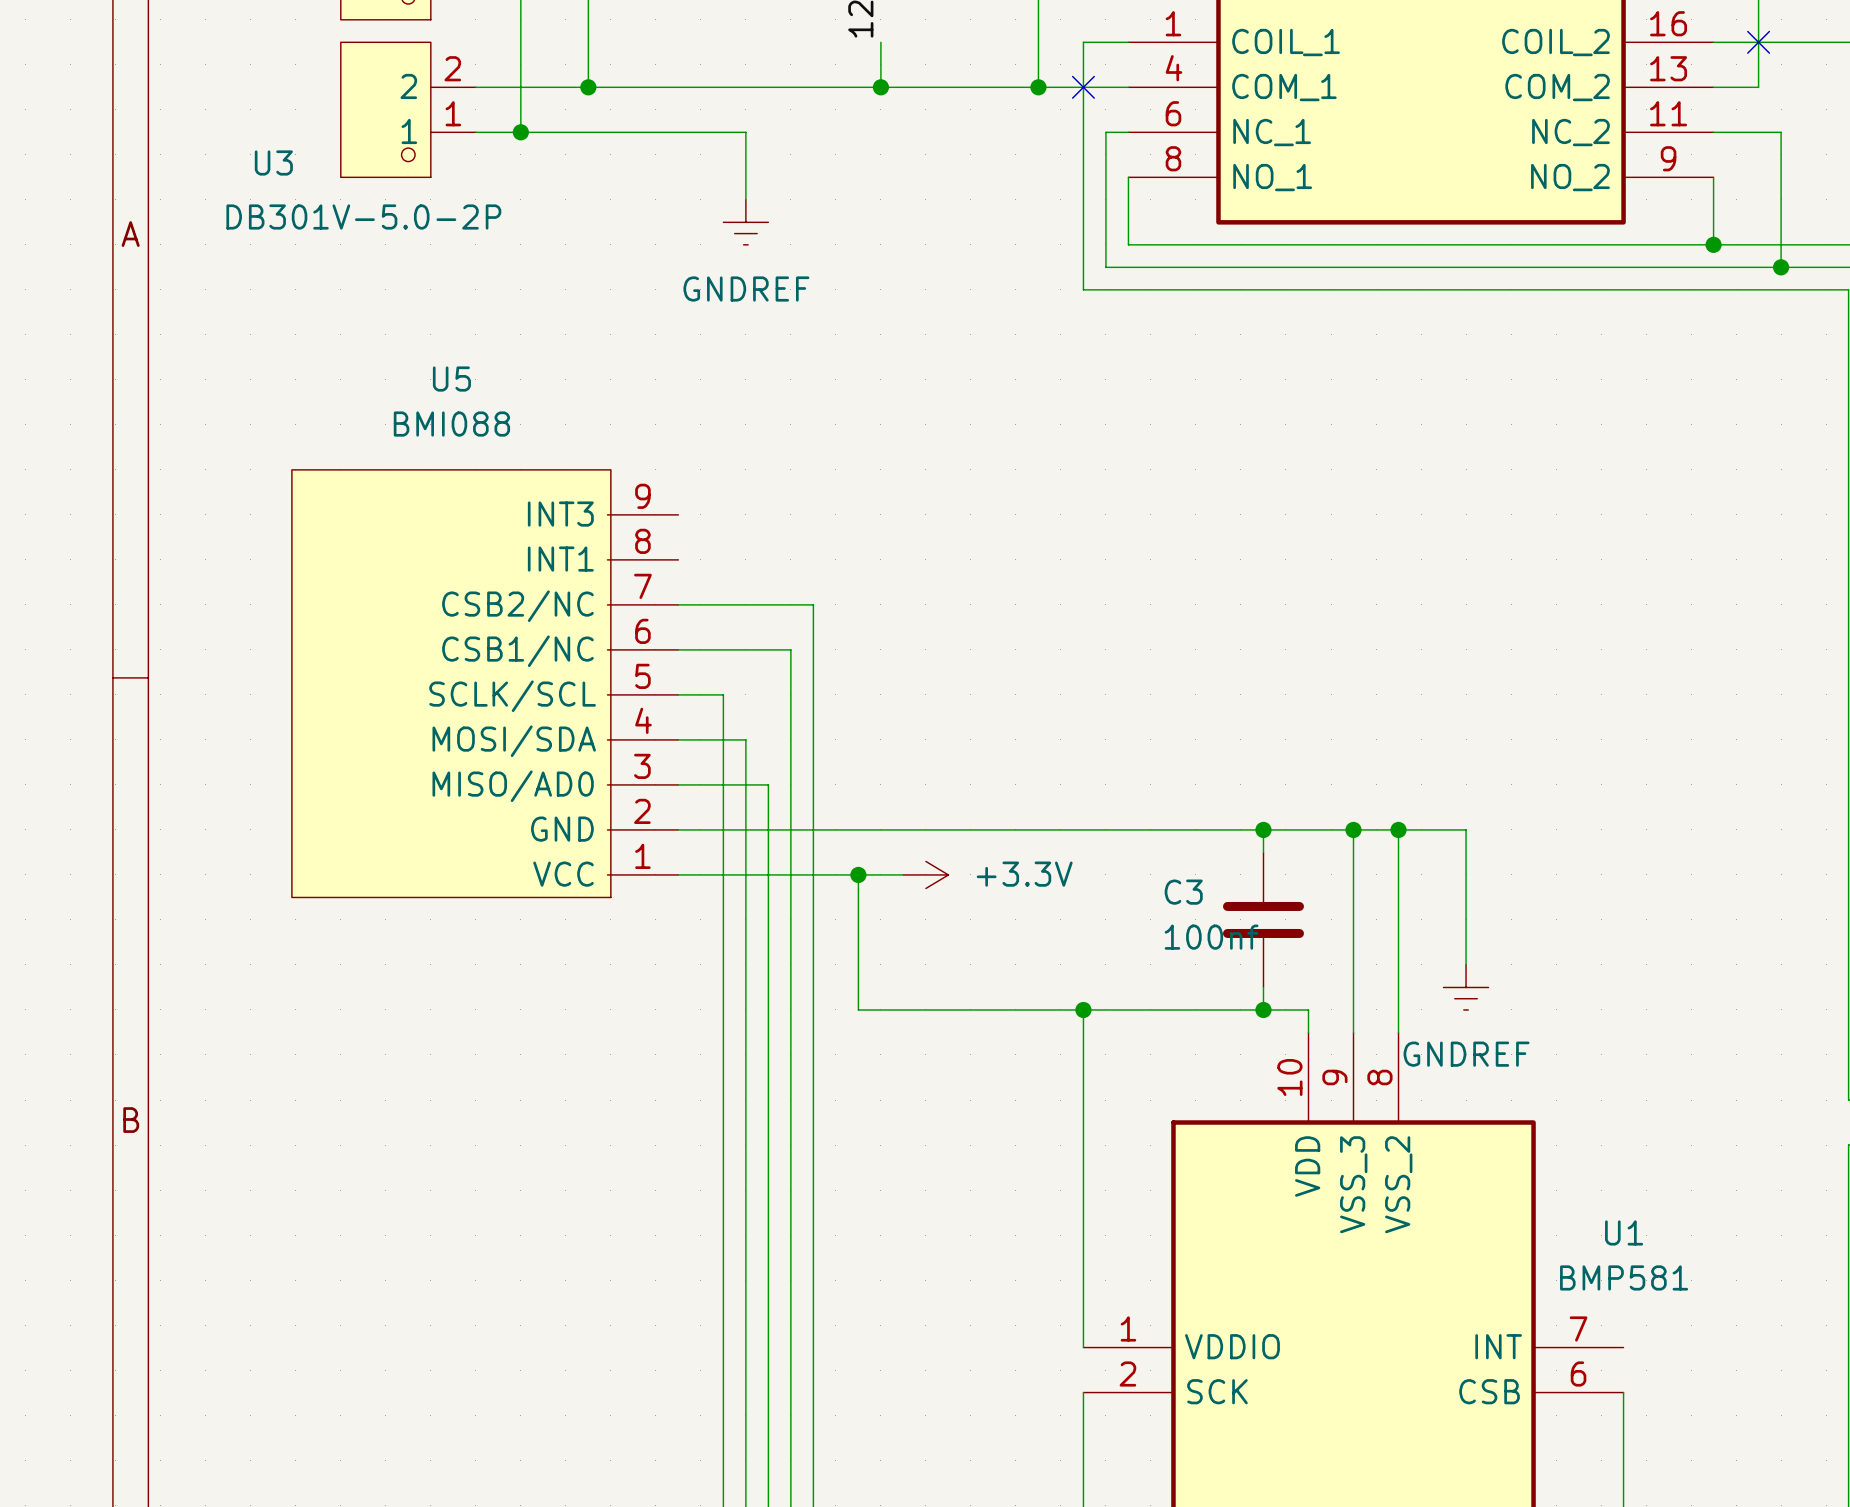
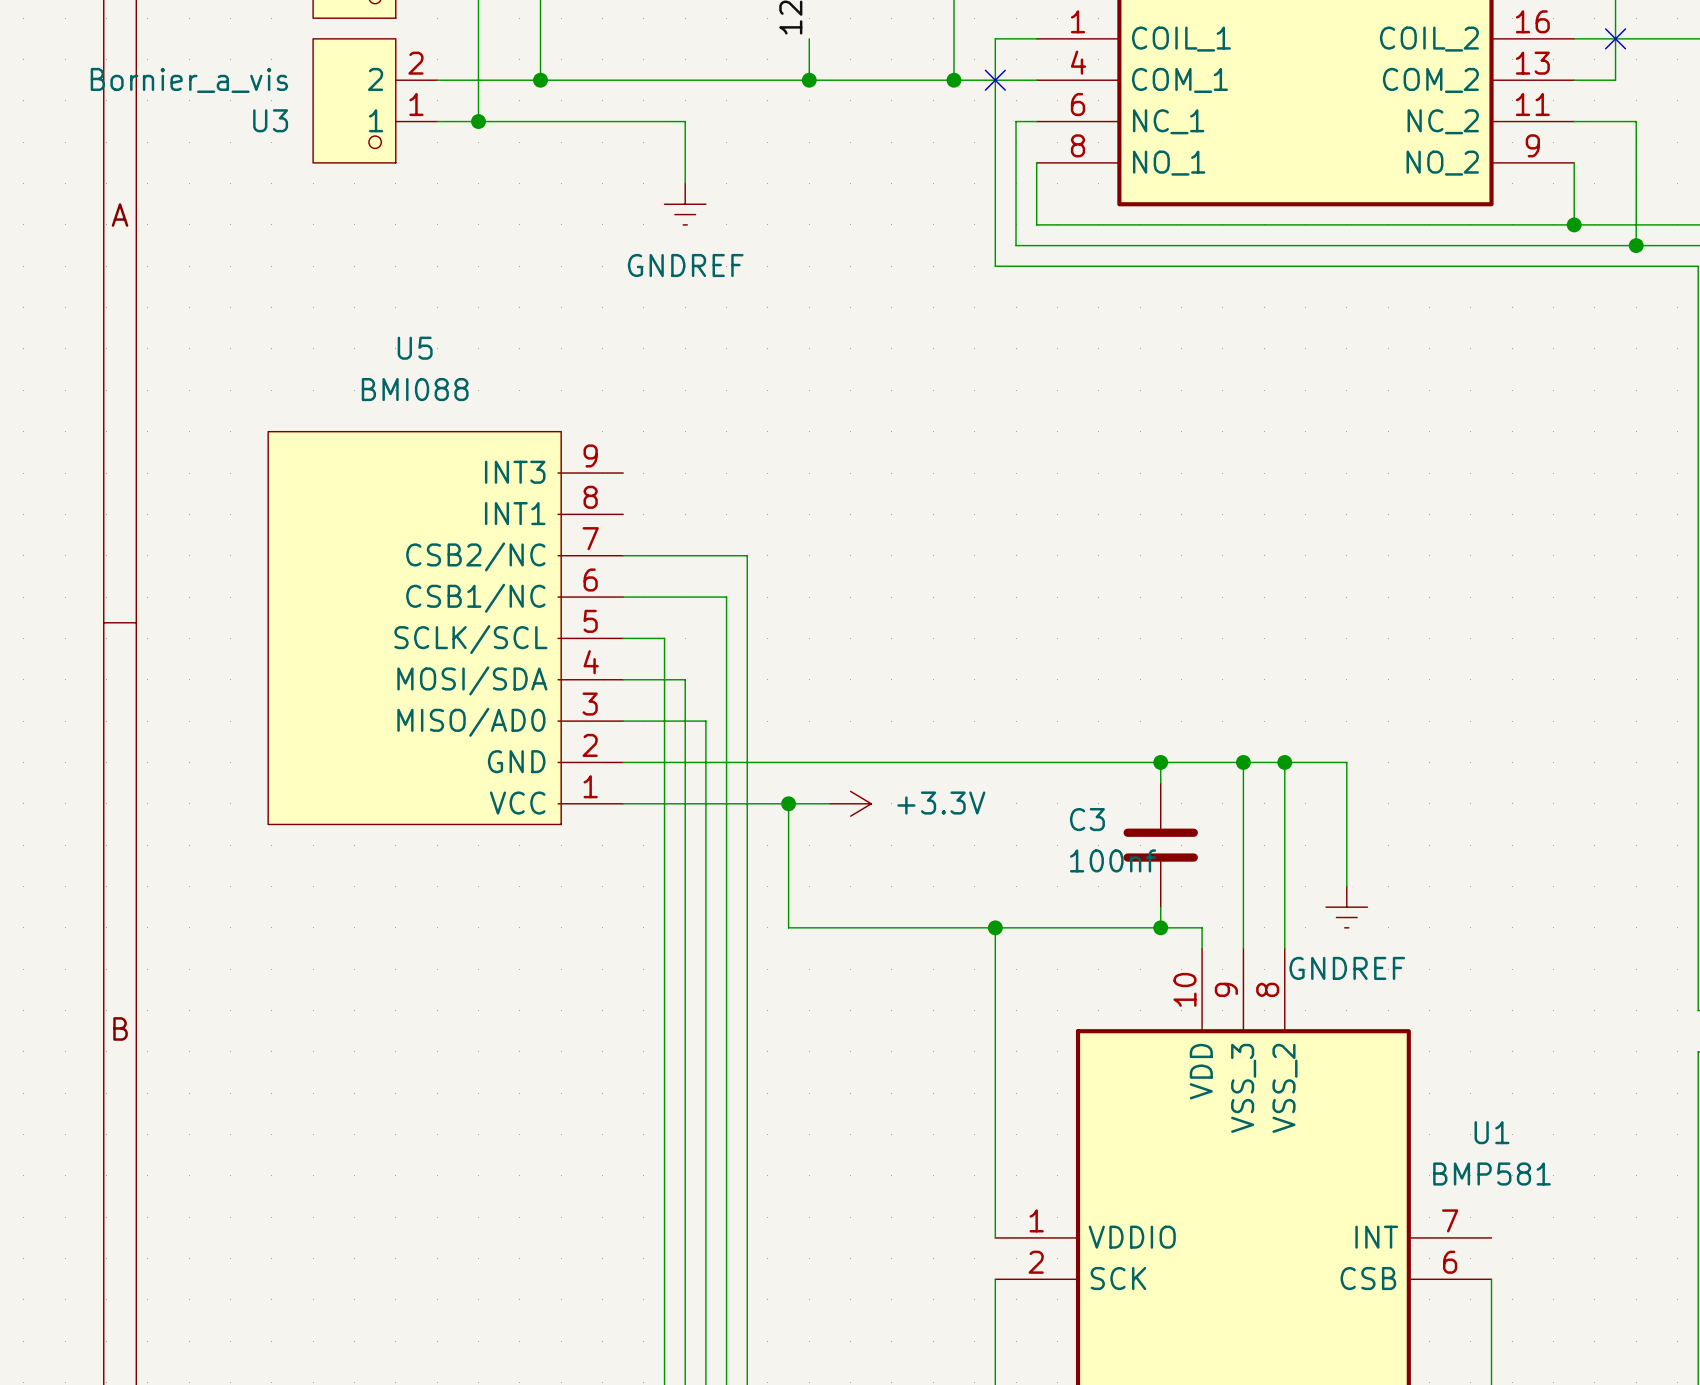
U3 name position: U3 (273, 162) -> U3 (270, 120)
U3 value: DB301V-5.0-2P (363, 217) -> Bornier_a_vis (189, 80)

